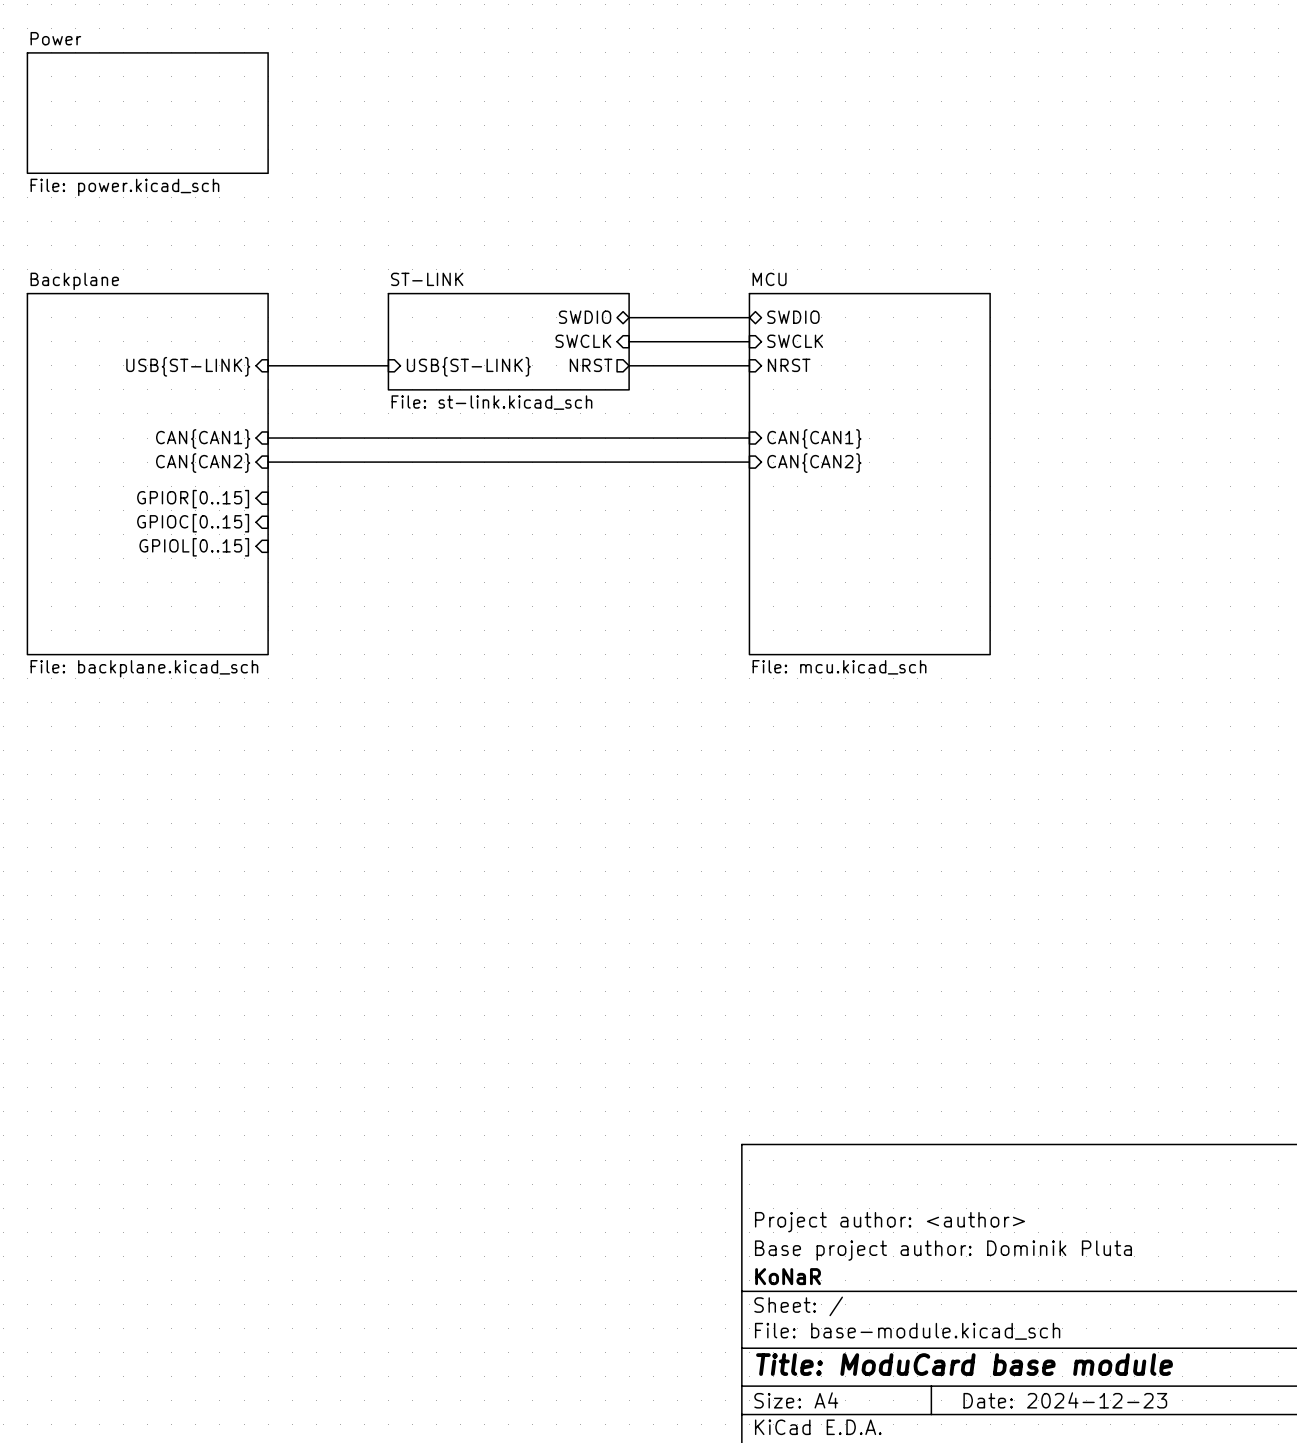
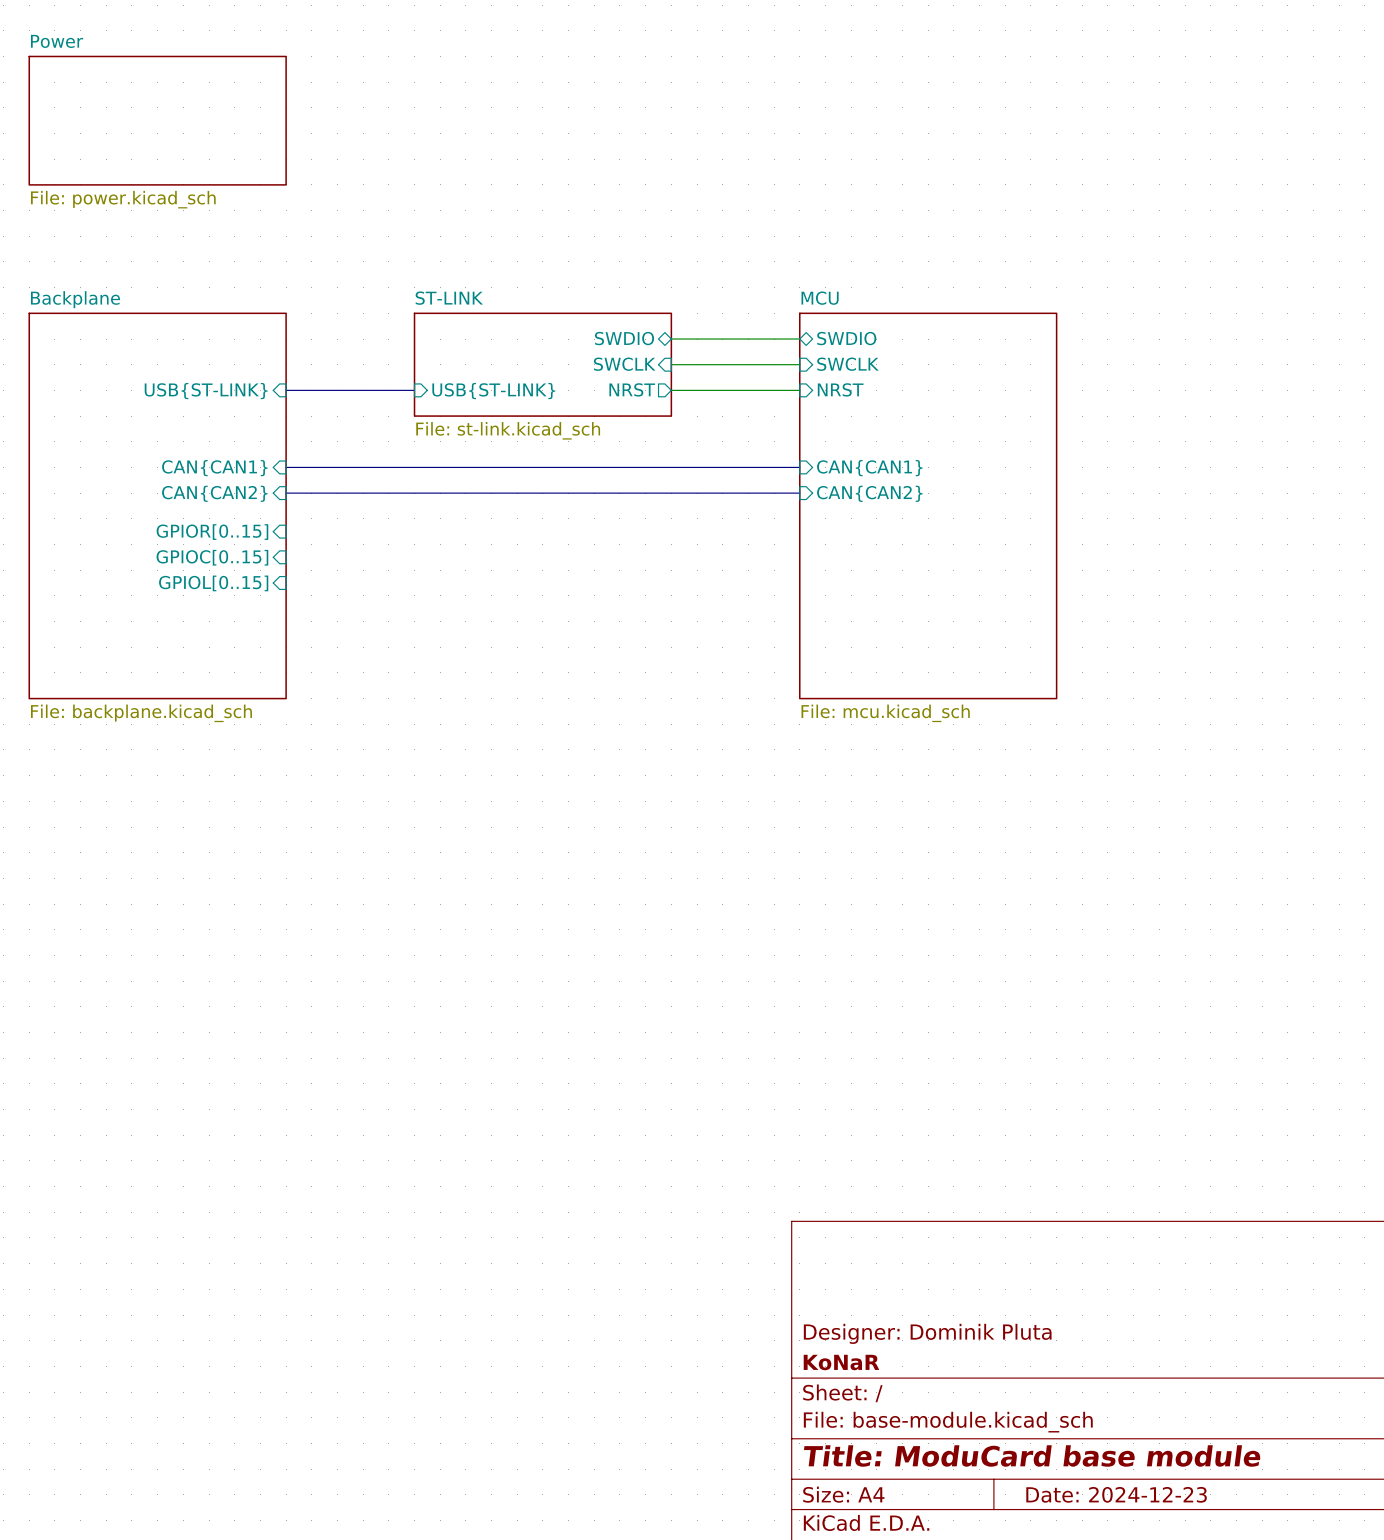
title block: Project author: <author> (890, 1222) -> none
title block: Base project author: Dominik Pluta (943, 1250) -> Designer: Dominik Pluta (927, 1333)

